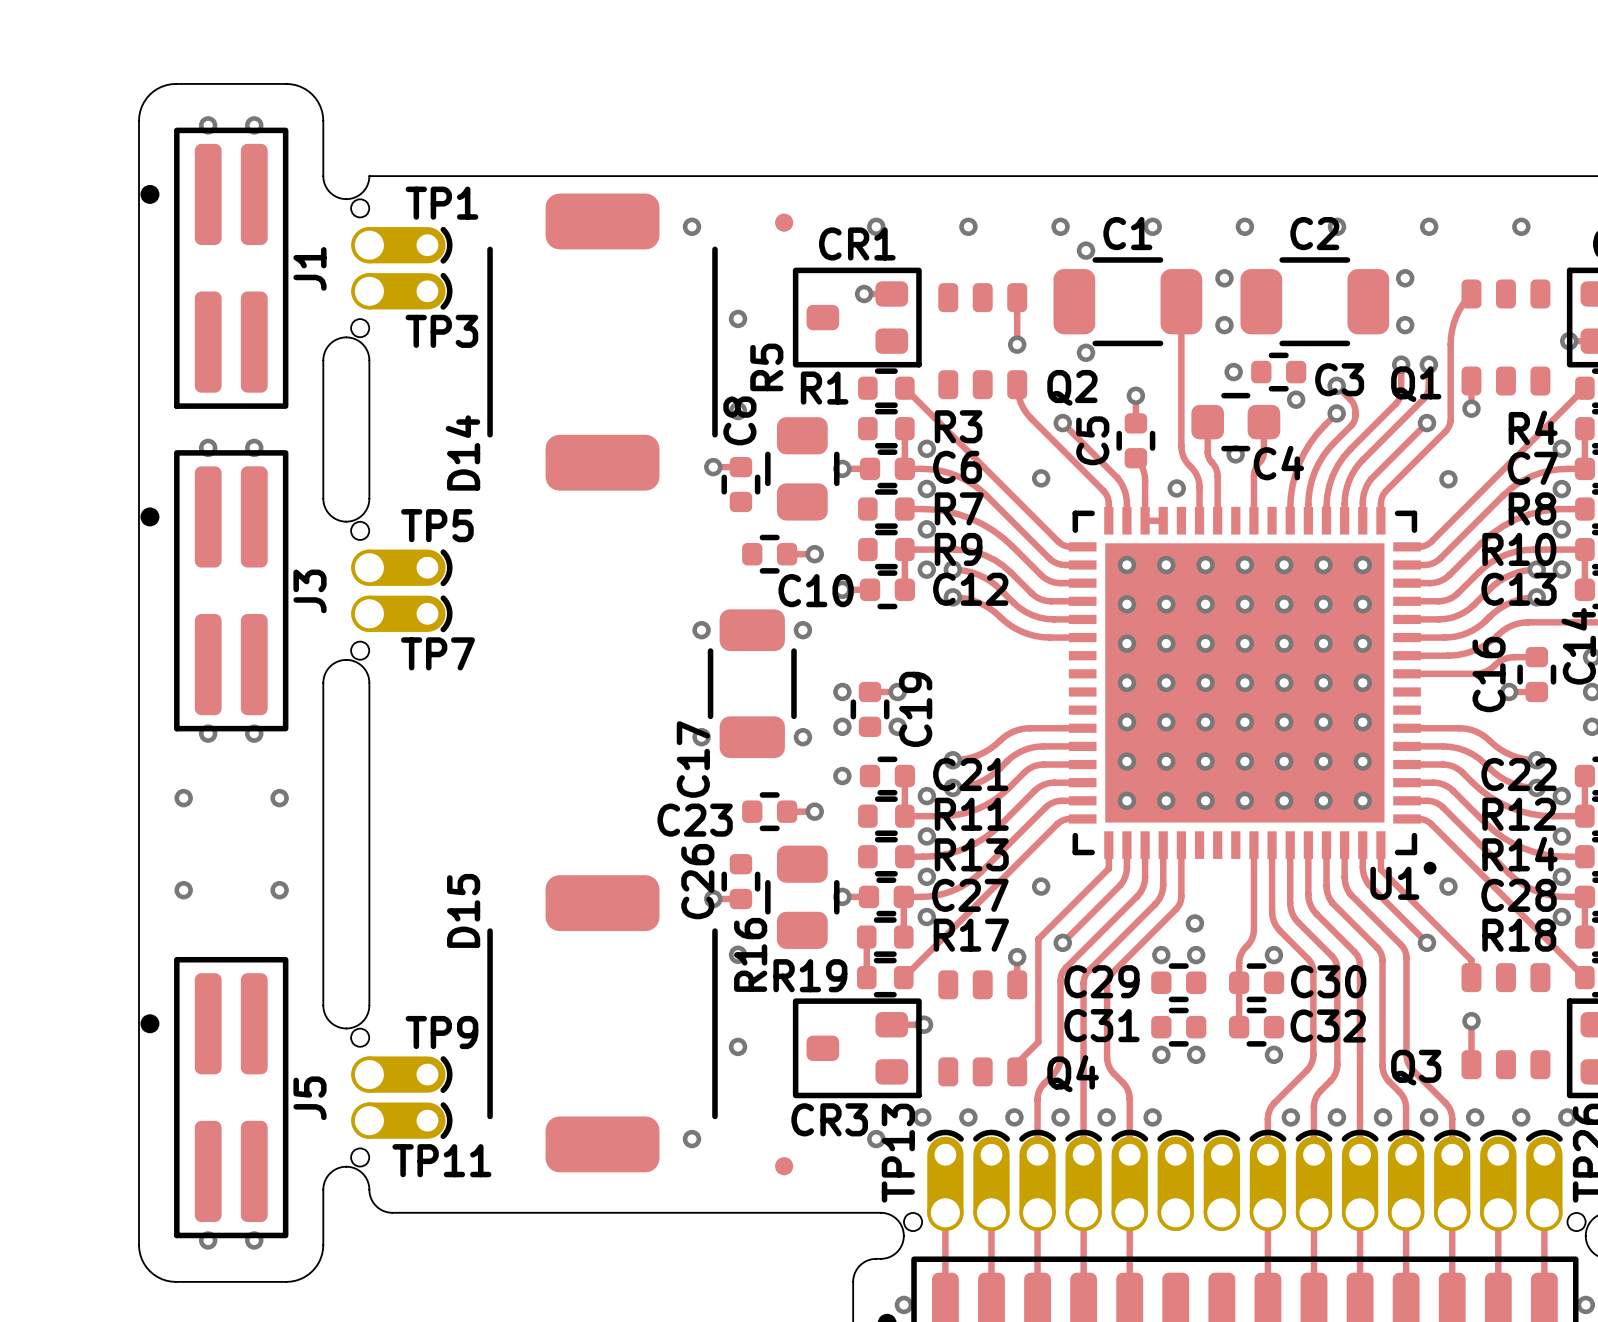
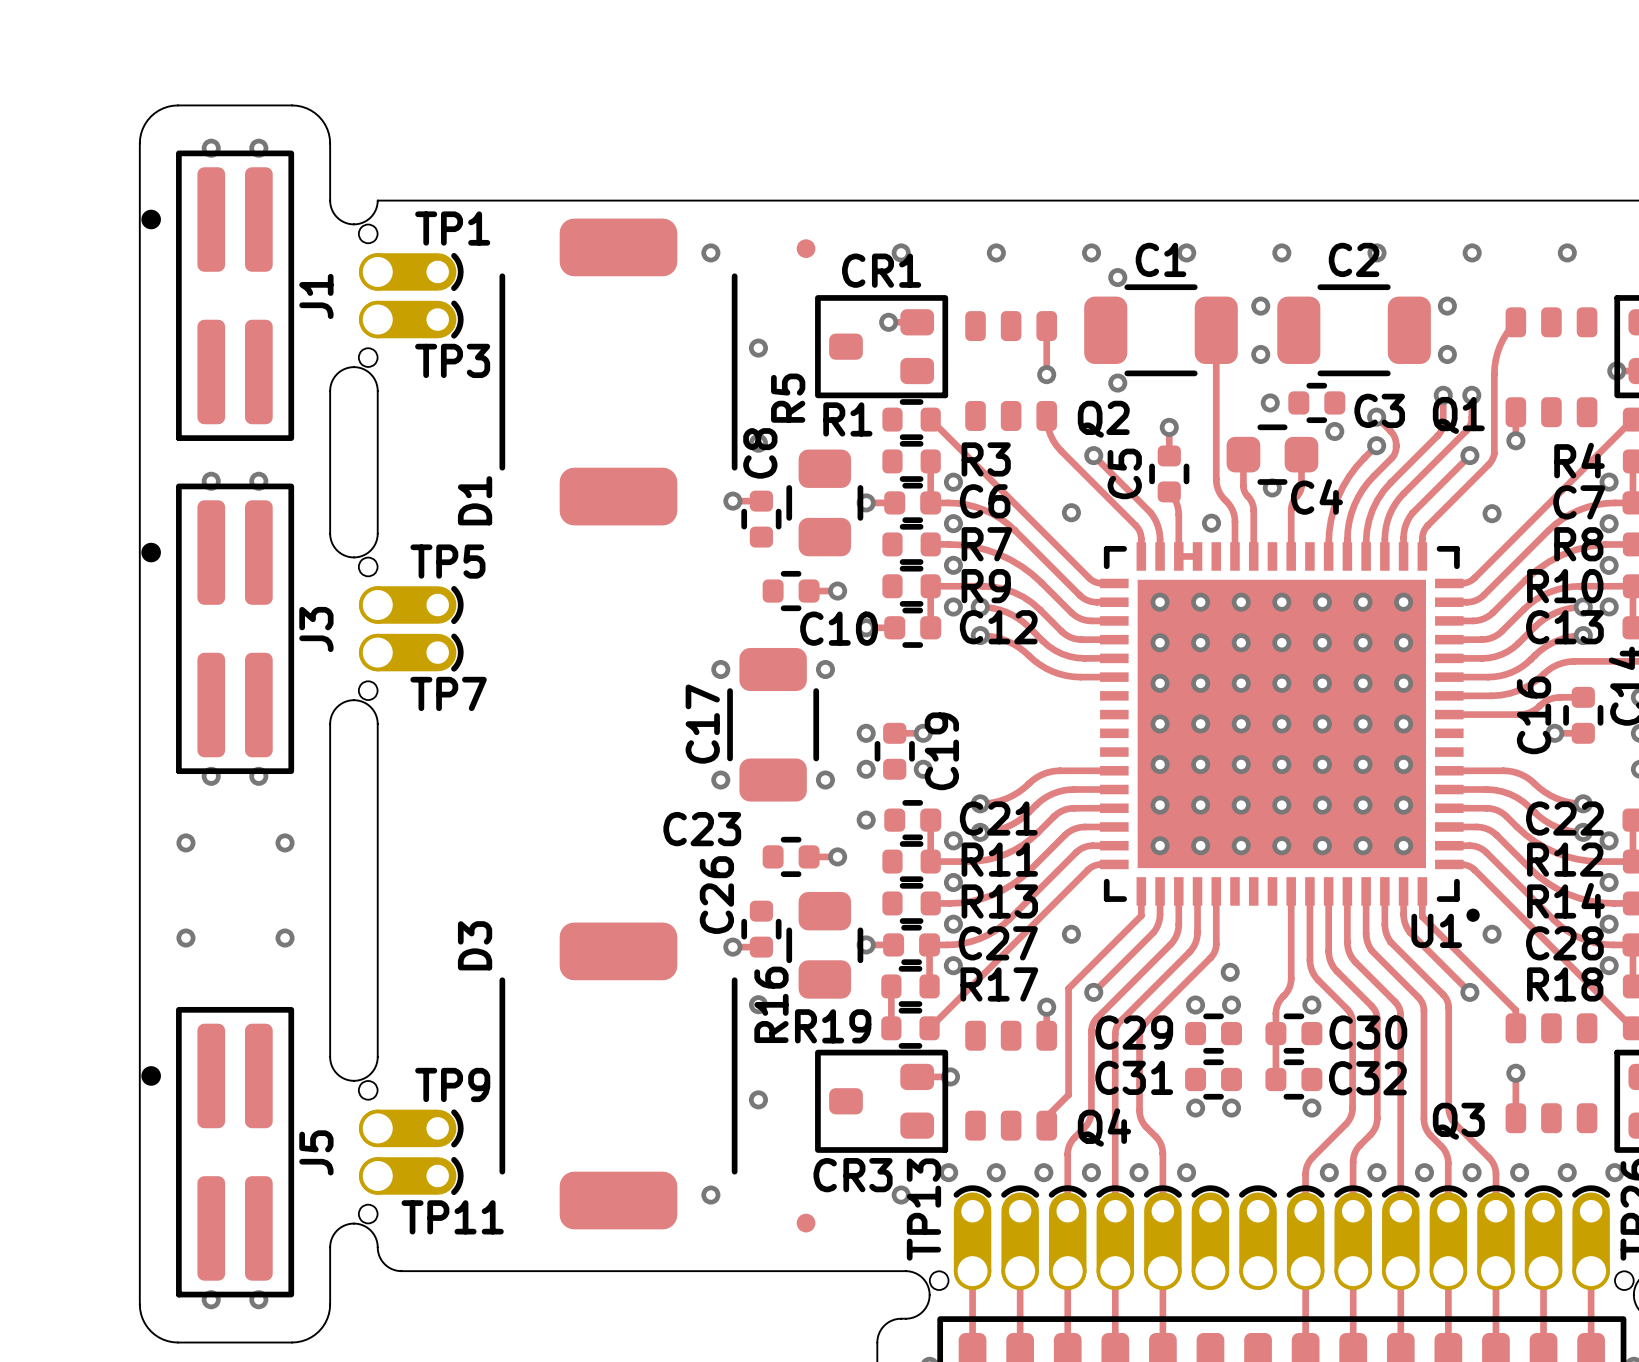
D14 name: D14 (462, 452) -> D1 (475, 500)
C17 name position: C17 (693, 759) -> C17 (702, 724)
C23 name position: C23 (695, 820) -> C23 (702, 829)
C26 name position: C26 (697, 881) -> C26 (716, 895)
D15 name: D15 (463, 910) -> D3 (475, 945)

